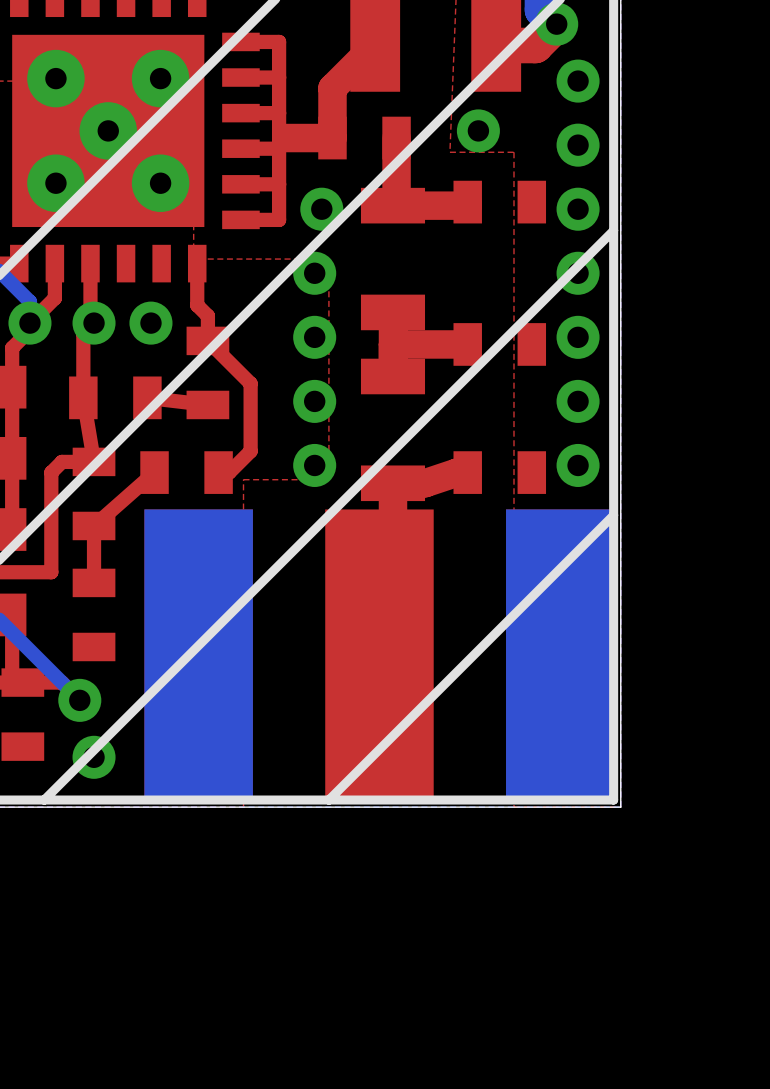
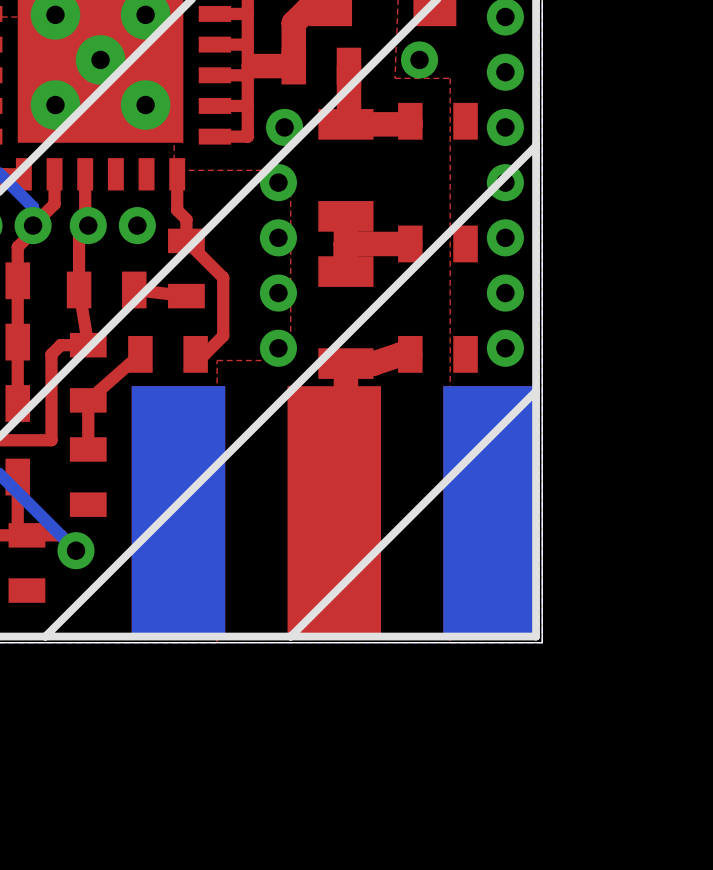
via: (94, 757) -> none

